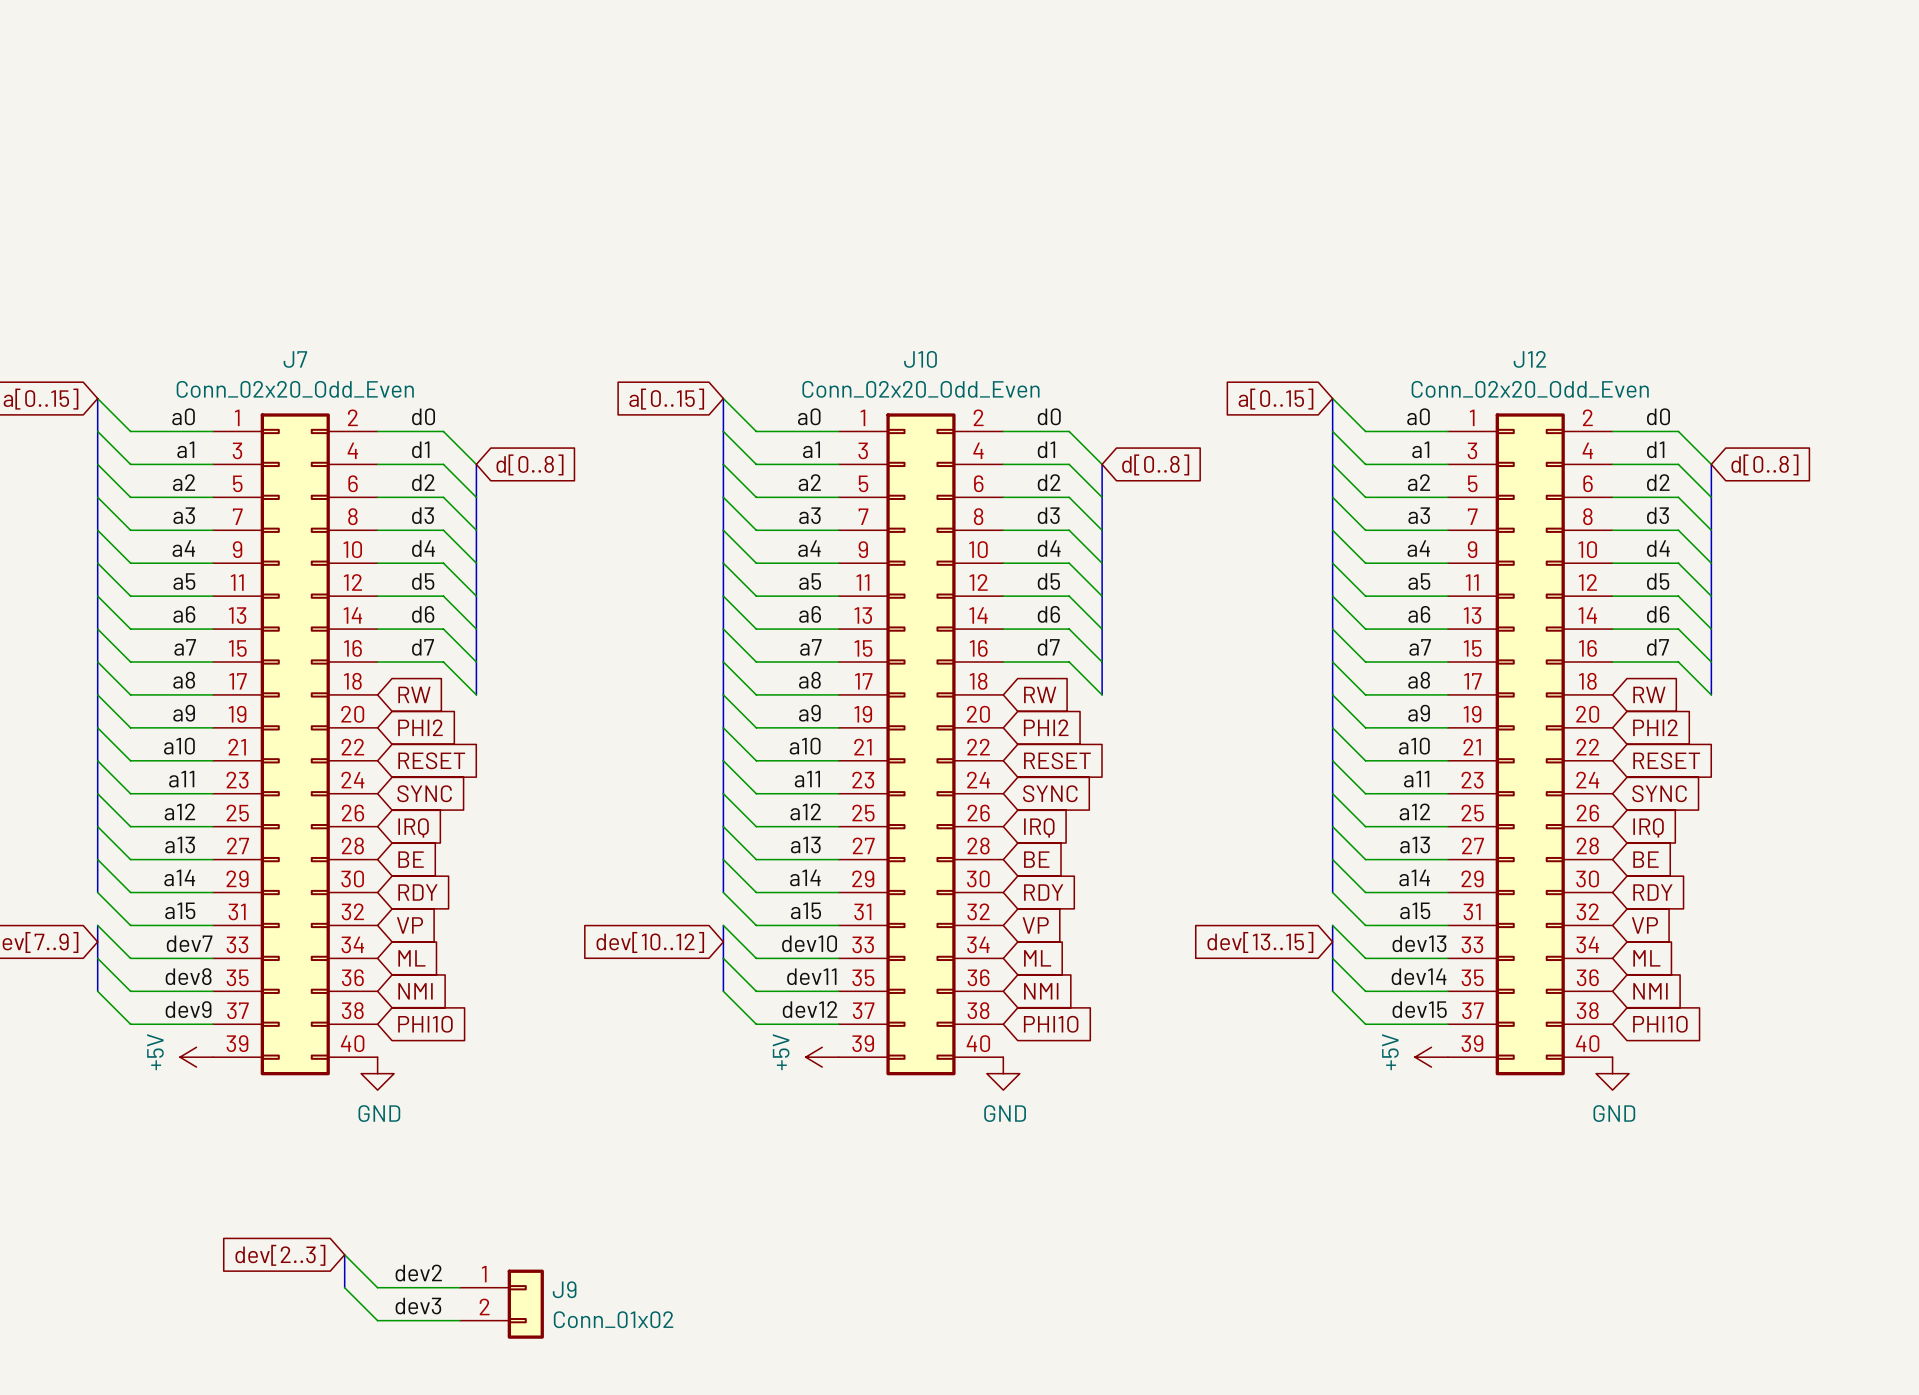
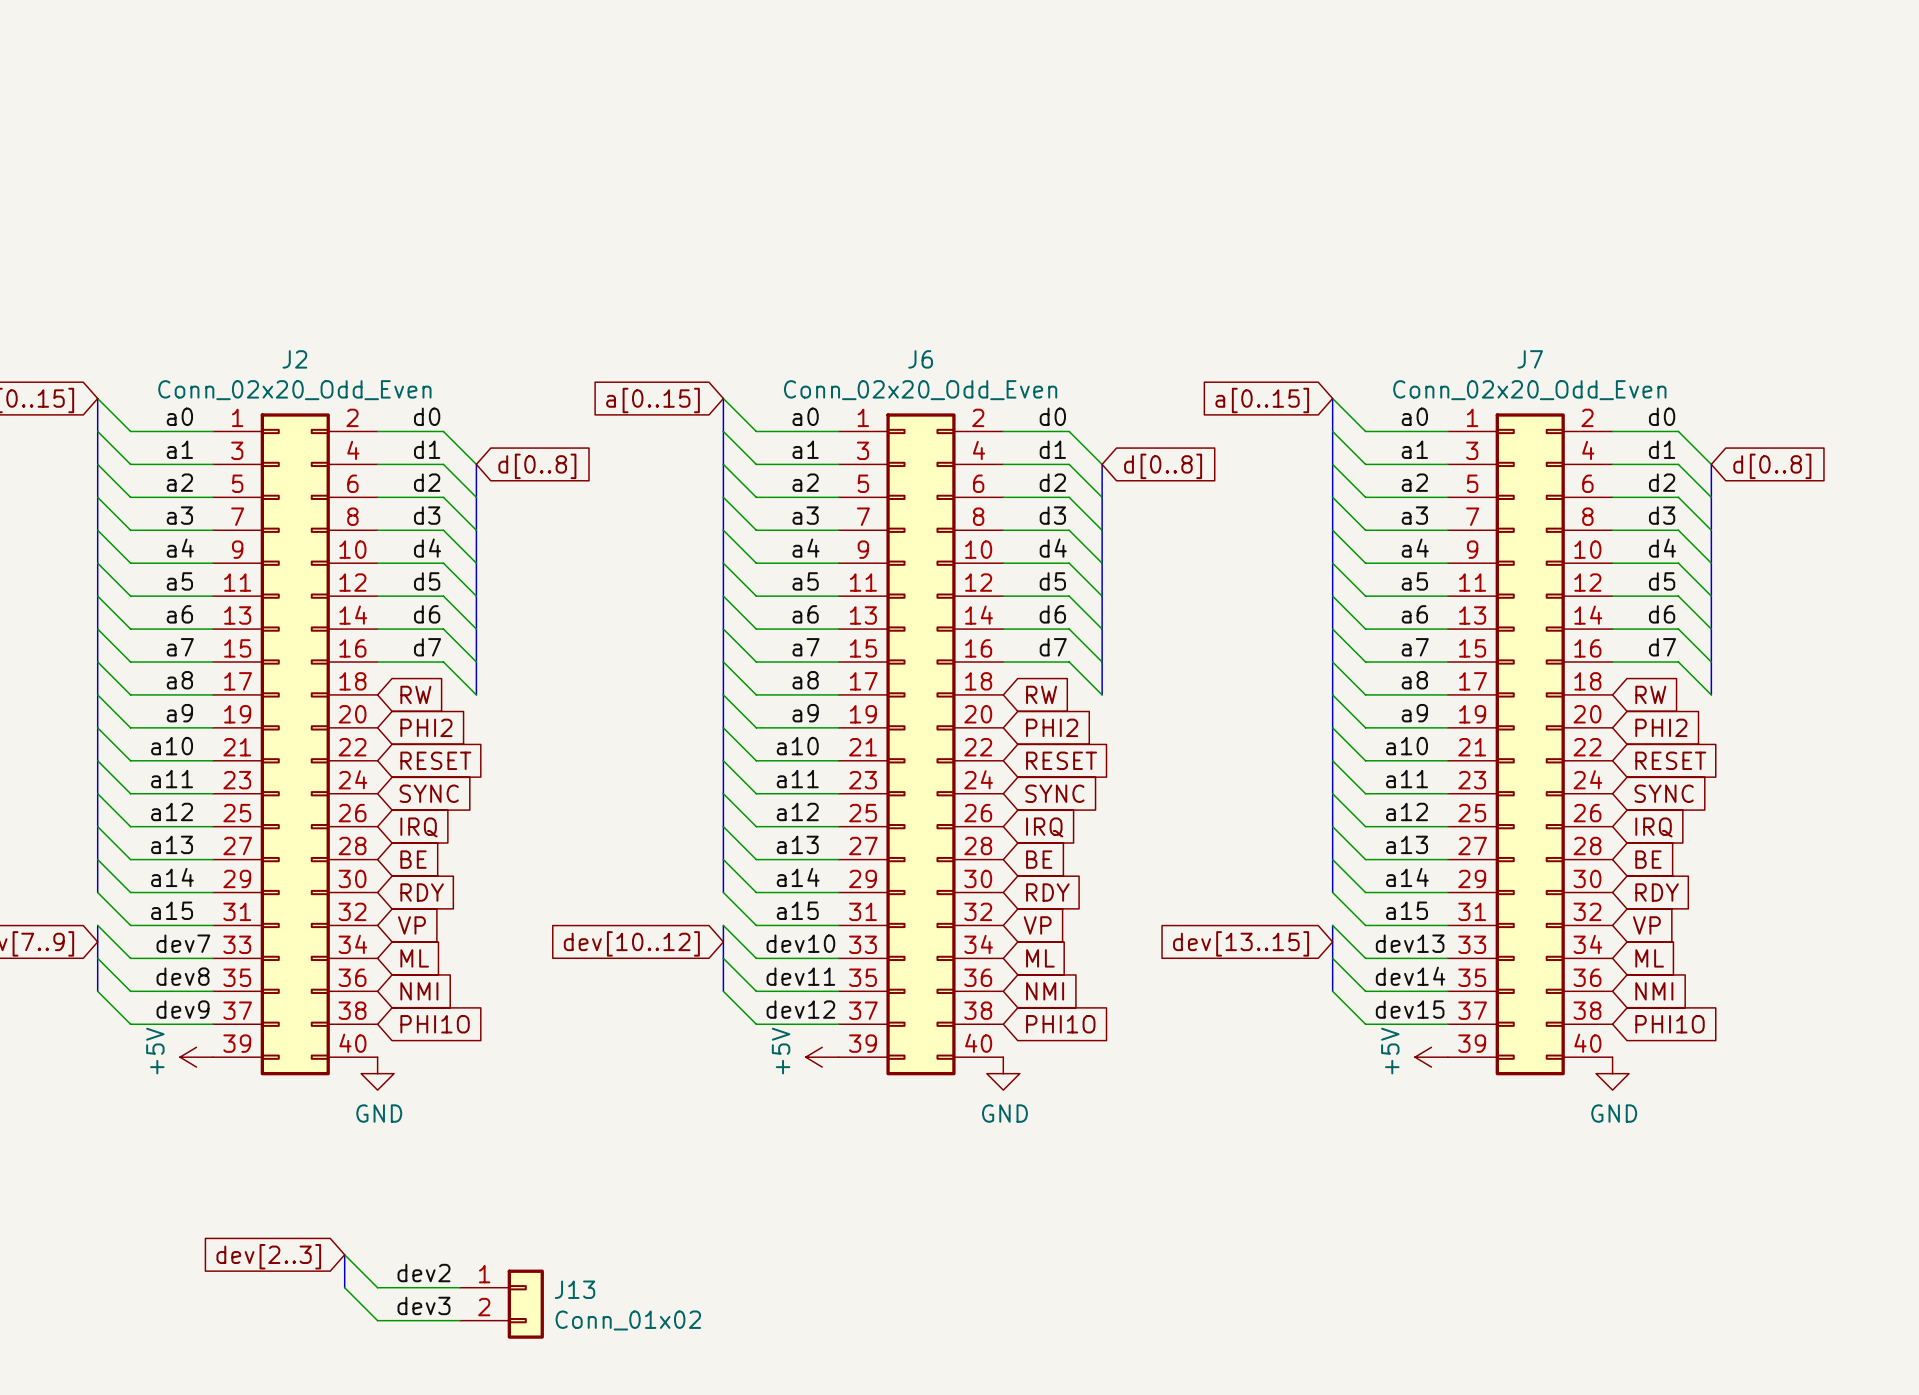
J7 name: J7 (295, 359) -> J2 (294, 359)
J10 name: J10 (920, 359) -> J6 (920, 359)
J12 name: J12 (1529, 359) -> J7 (1530, 359)
J9 name: J9 (564, 1289) -> J13 (575, 1289)

